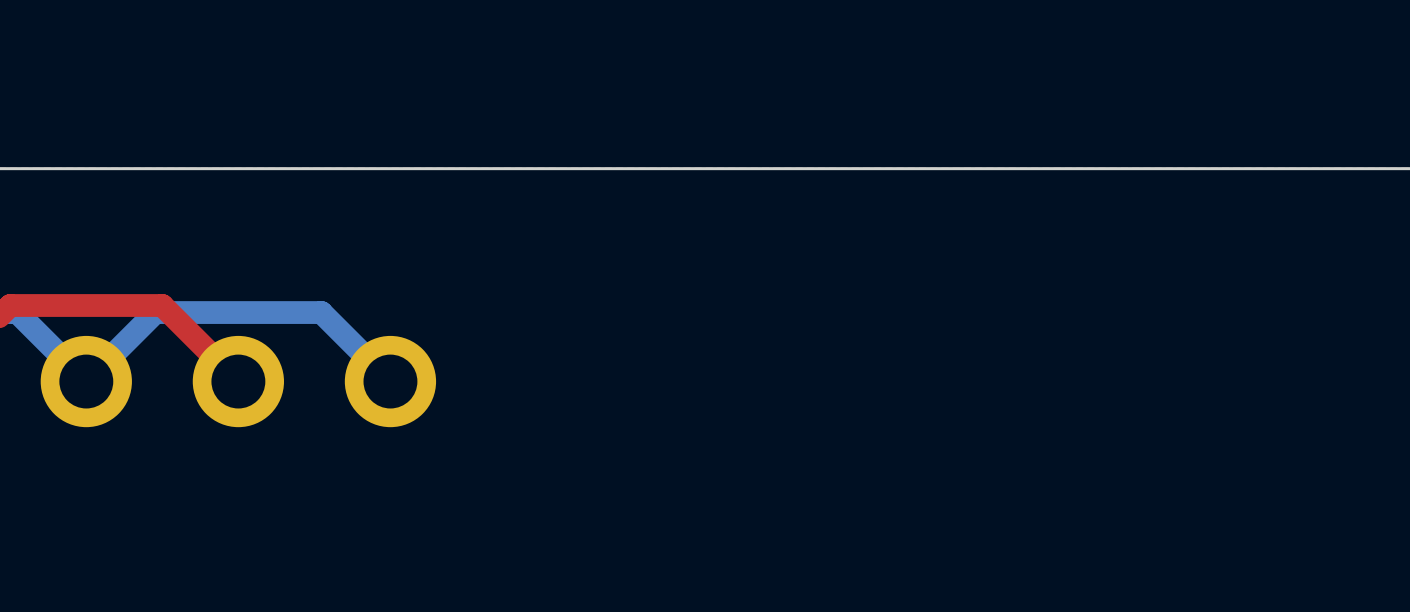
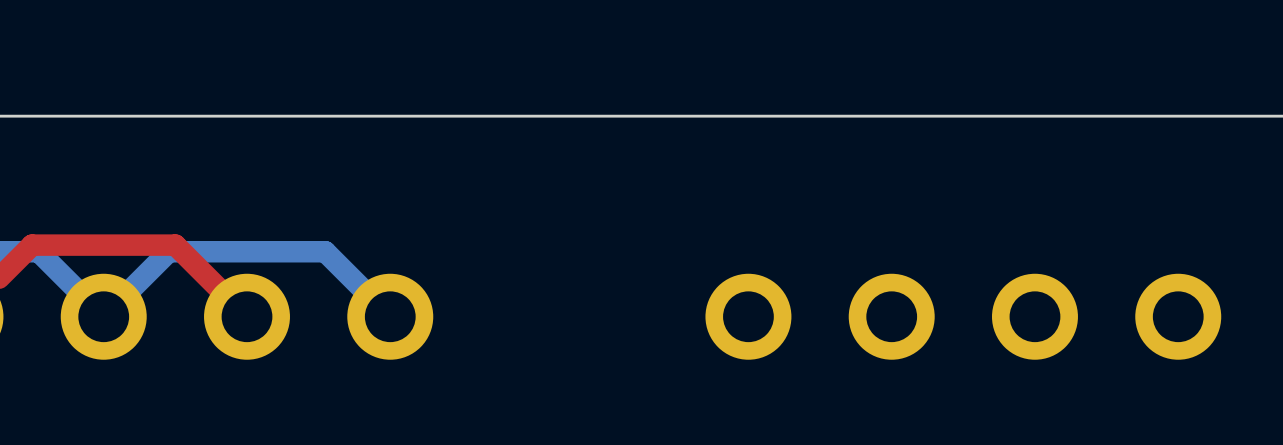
part: none -> (963, 316)

